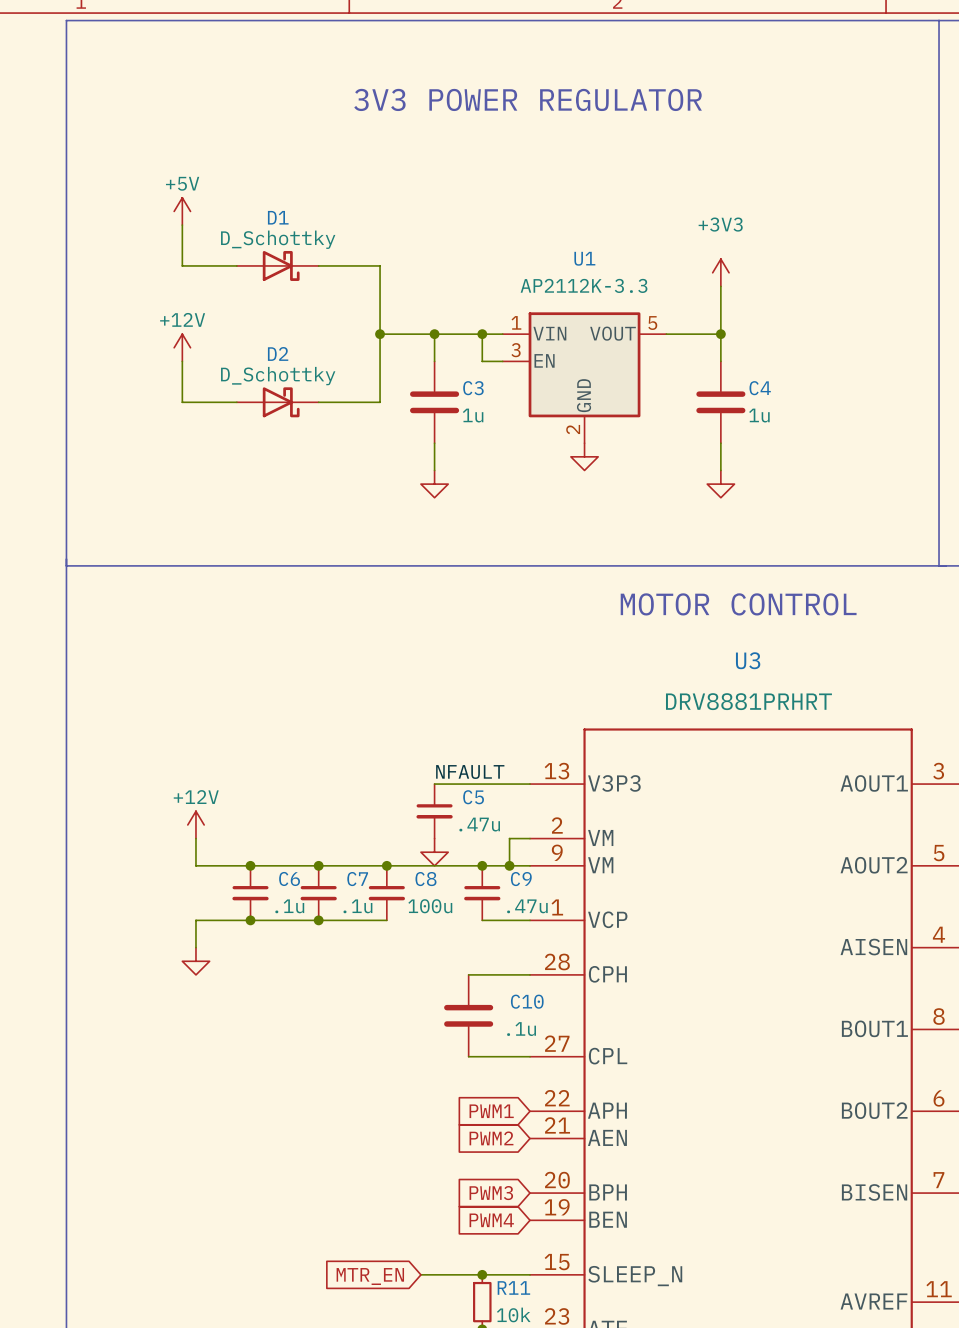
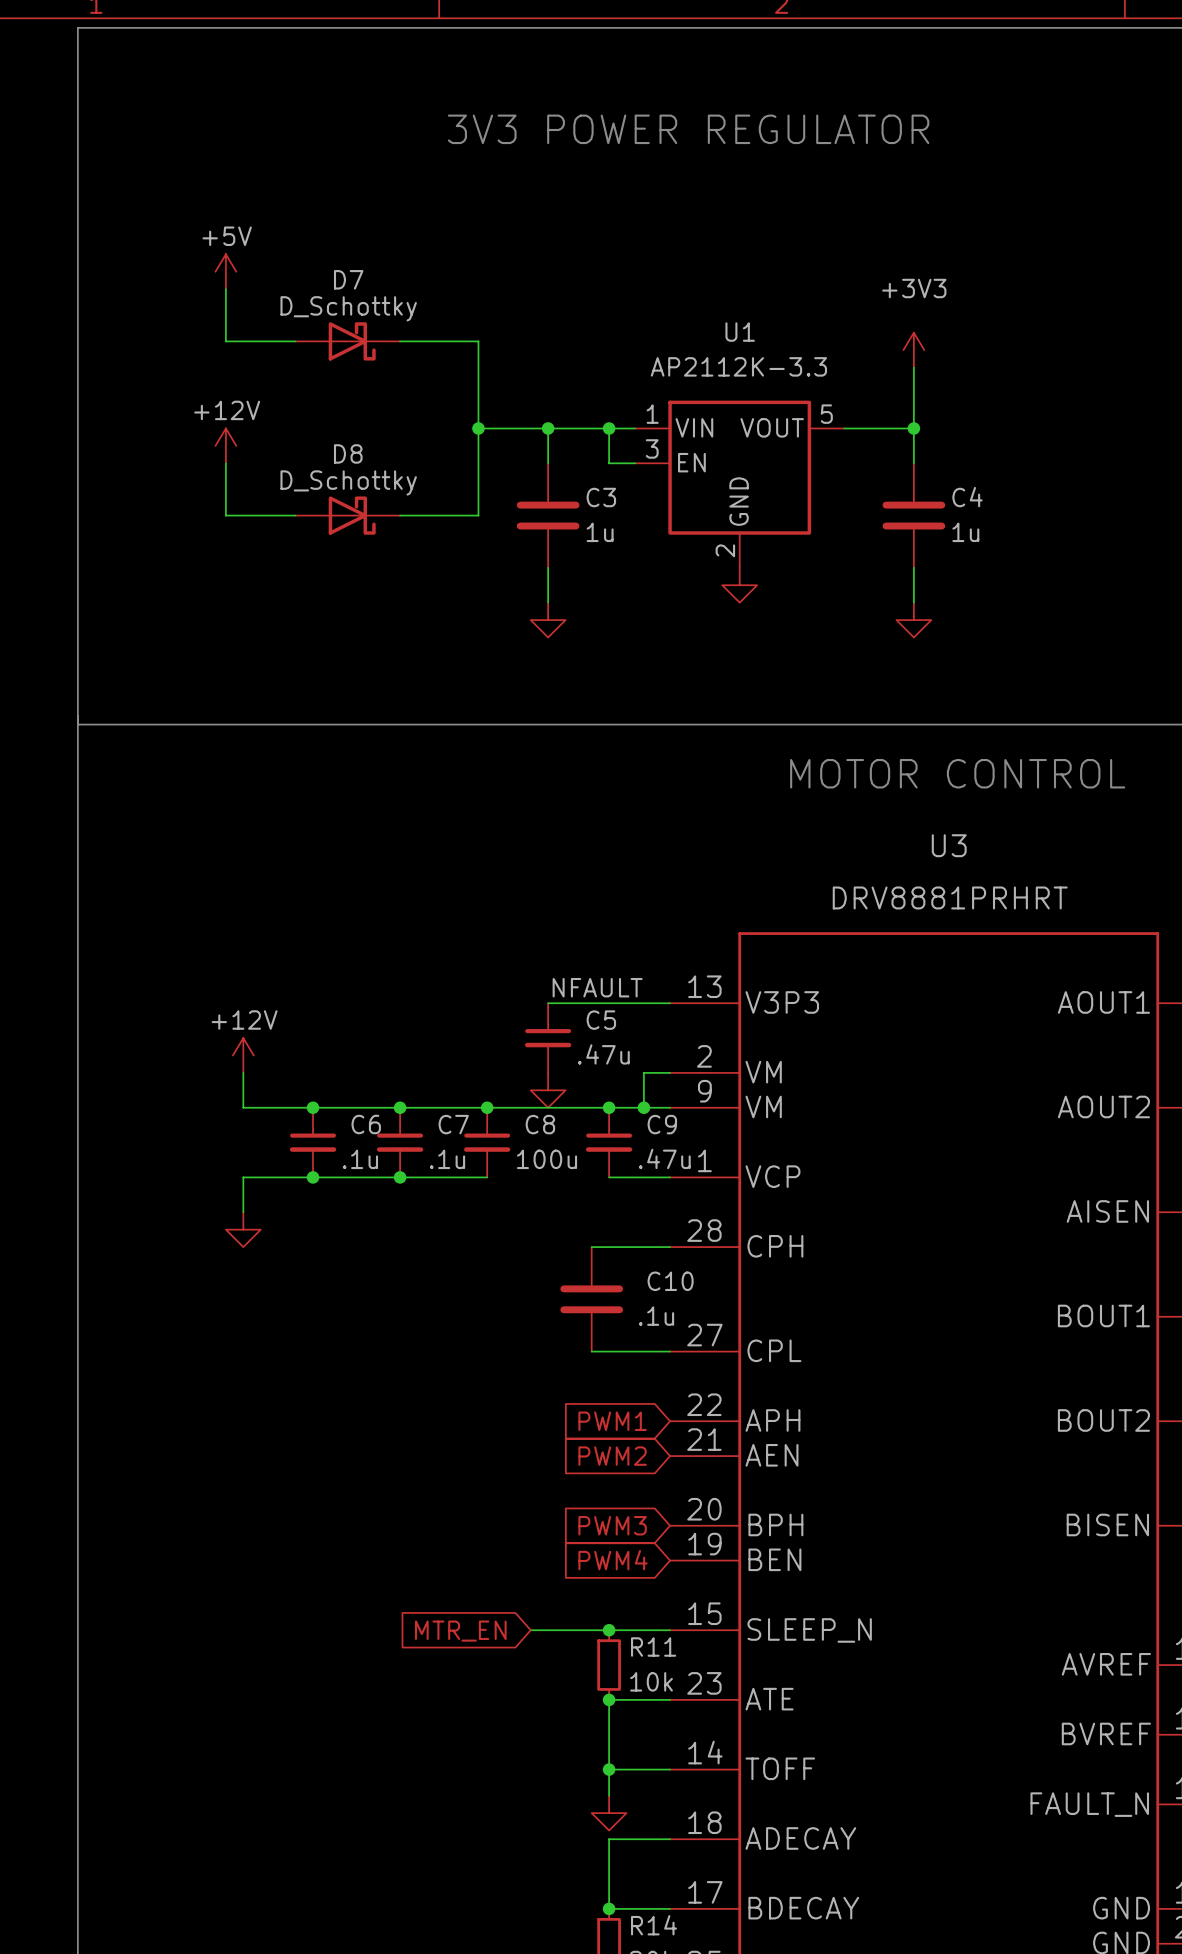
D1 name: D1 (278, 217) -> D7 (348, 279)
D2 name: D2 (278, 353) -> D8 (348, 453)

